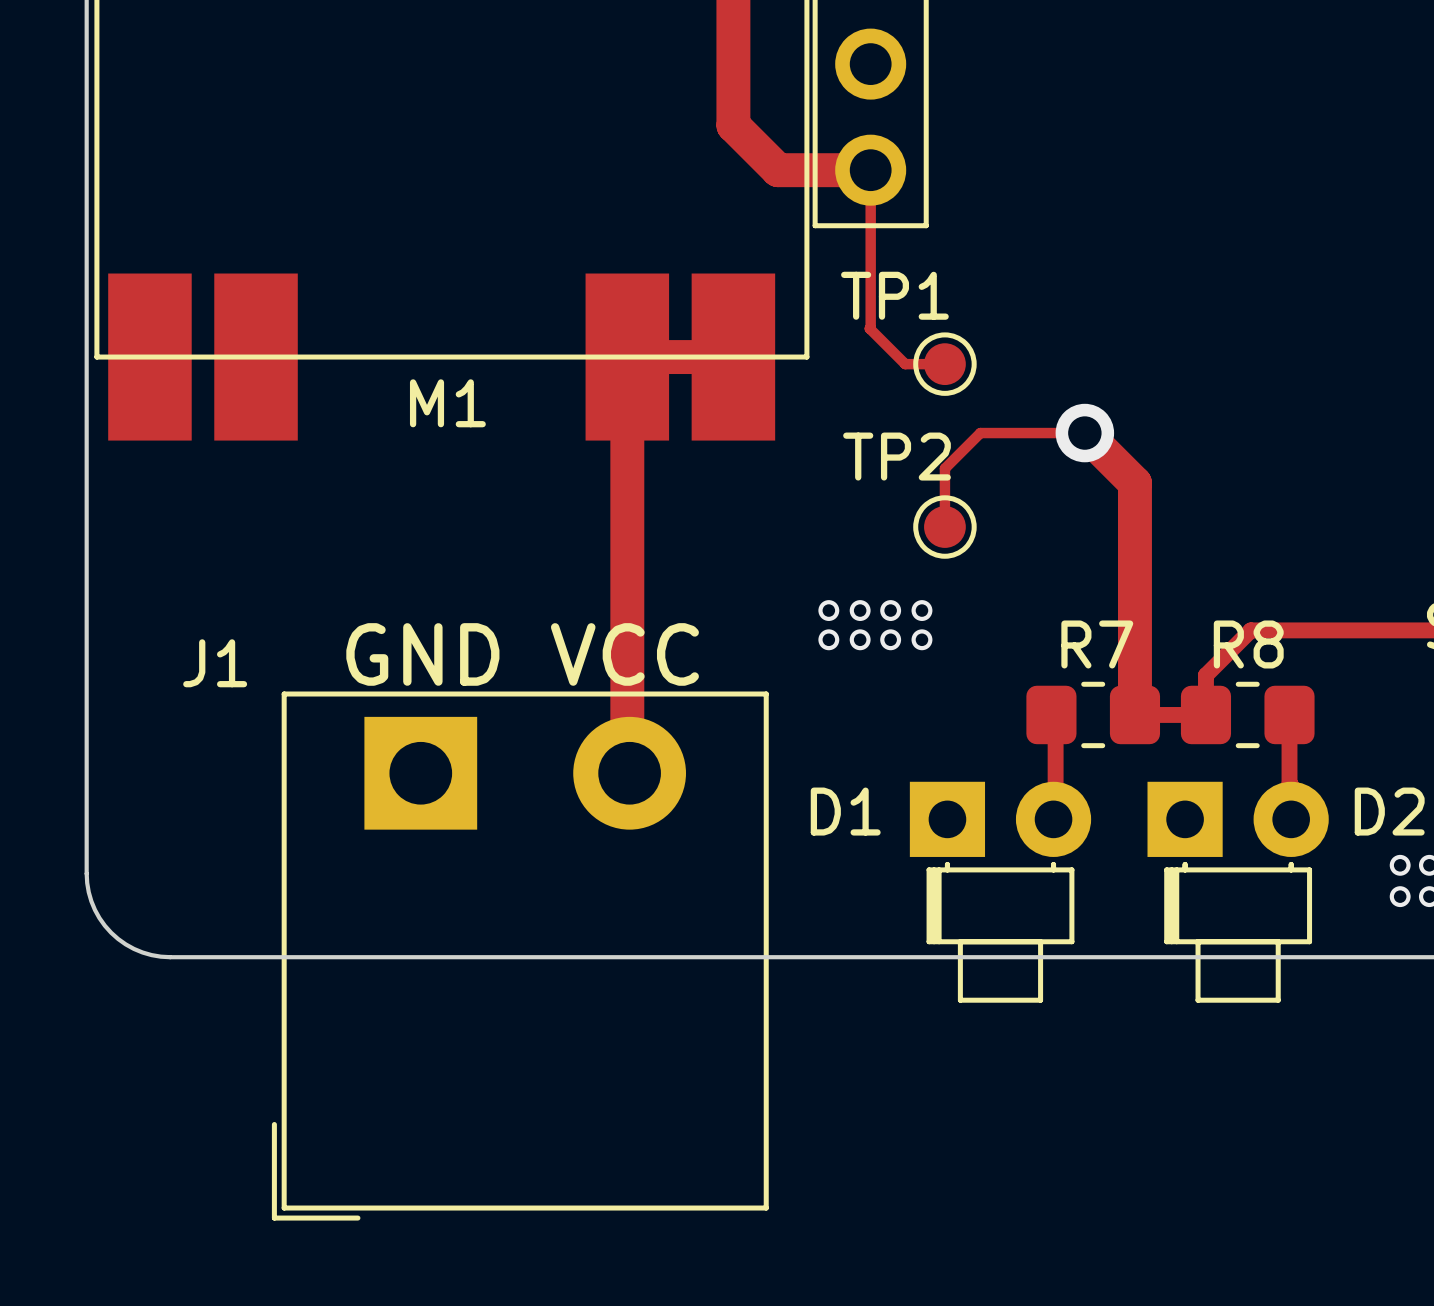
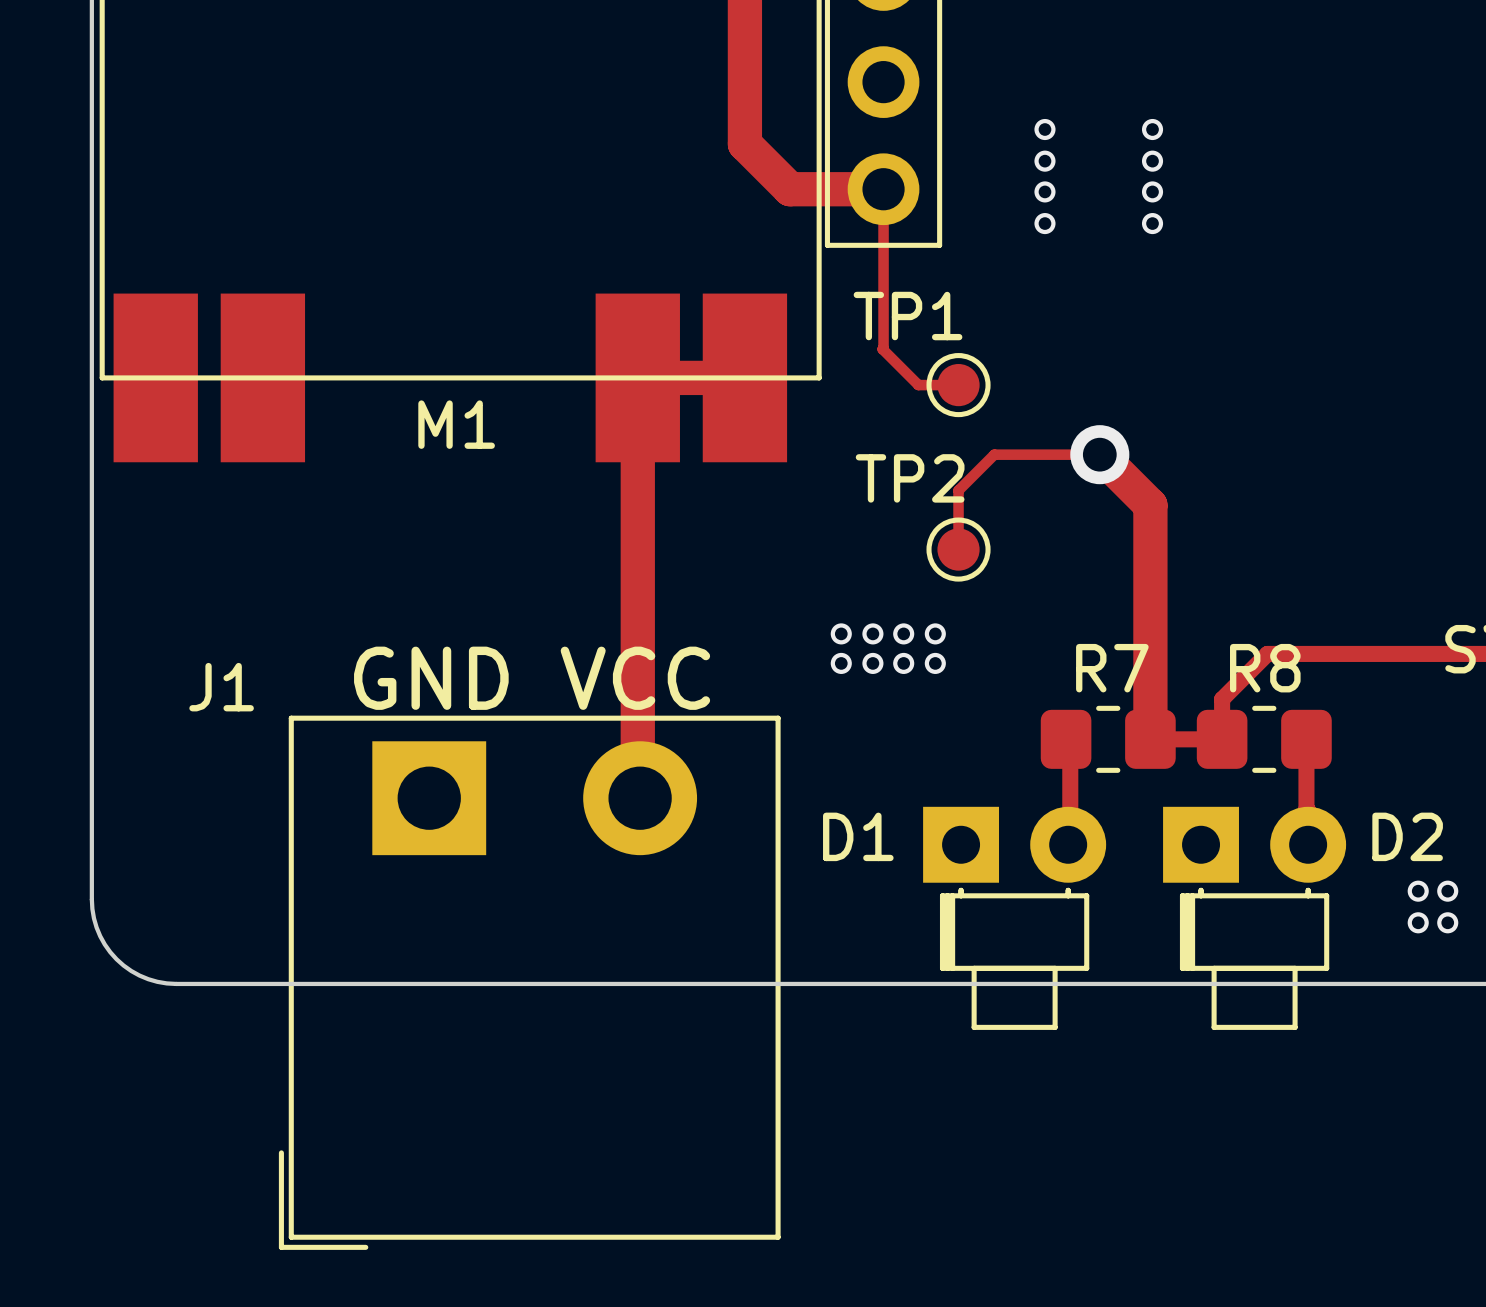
via: none -> (1044, 129)
via: none -> (1152, 129)
via: none -> (1044, 161)
via: none -> (1152, 161)
via: none -> (1044, 191)
via: none -> (1152, 191)
via: none -> (1044, 223)
via: none -> (1152, 223)

